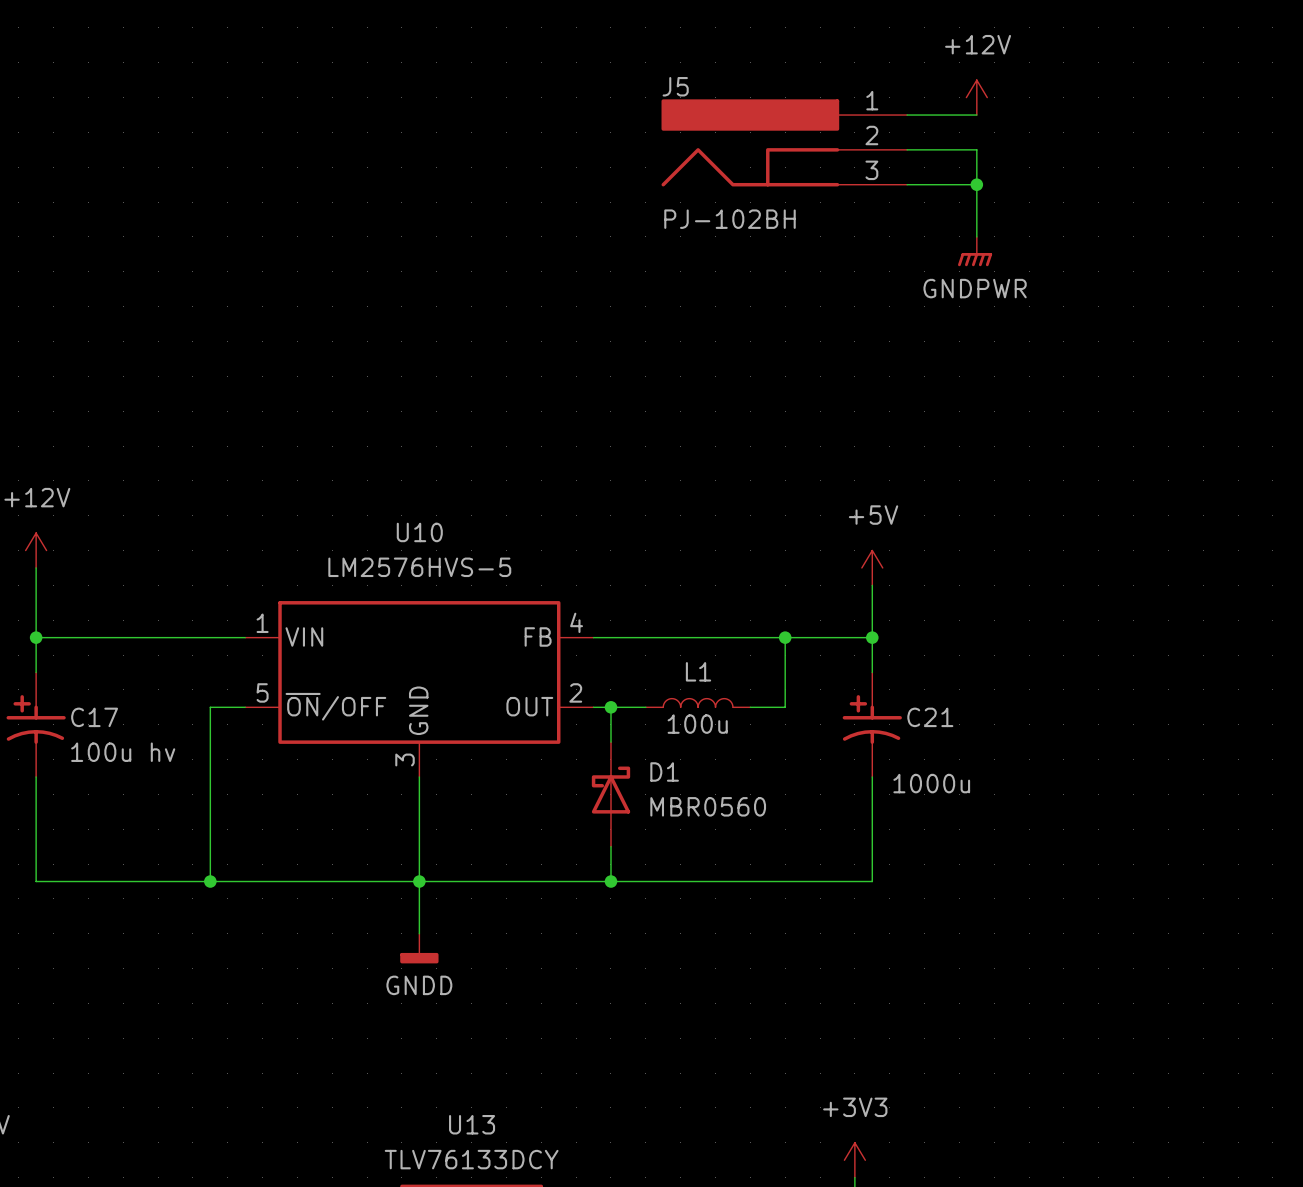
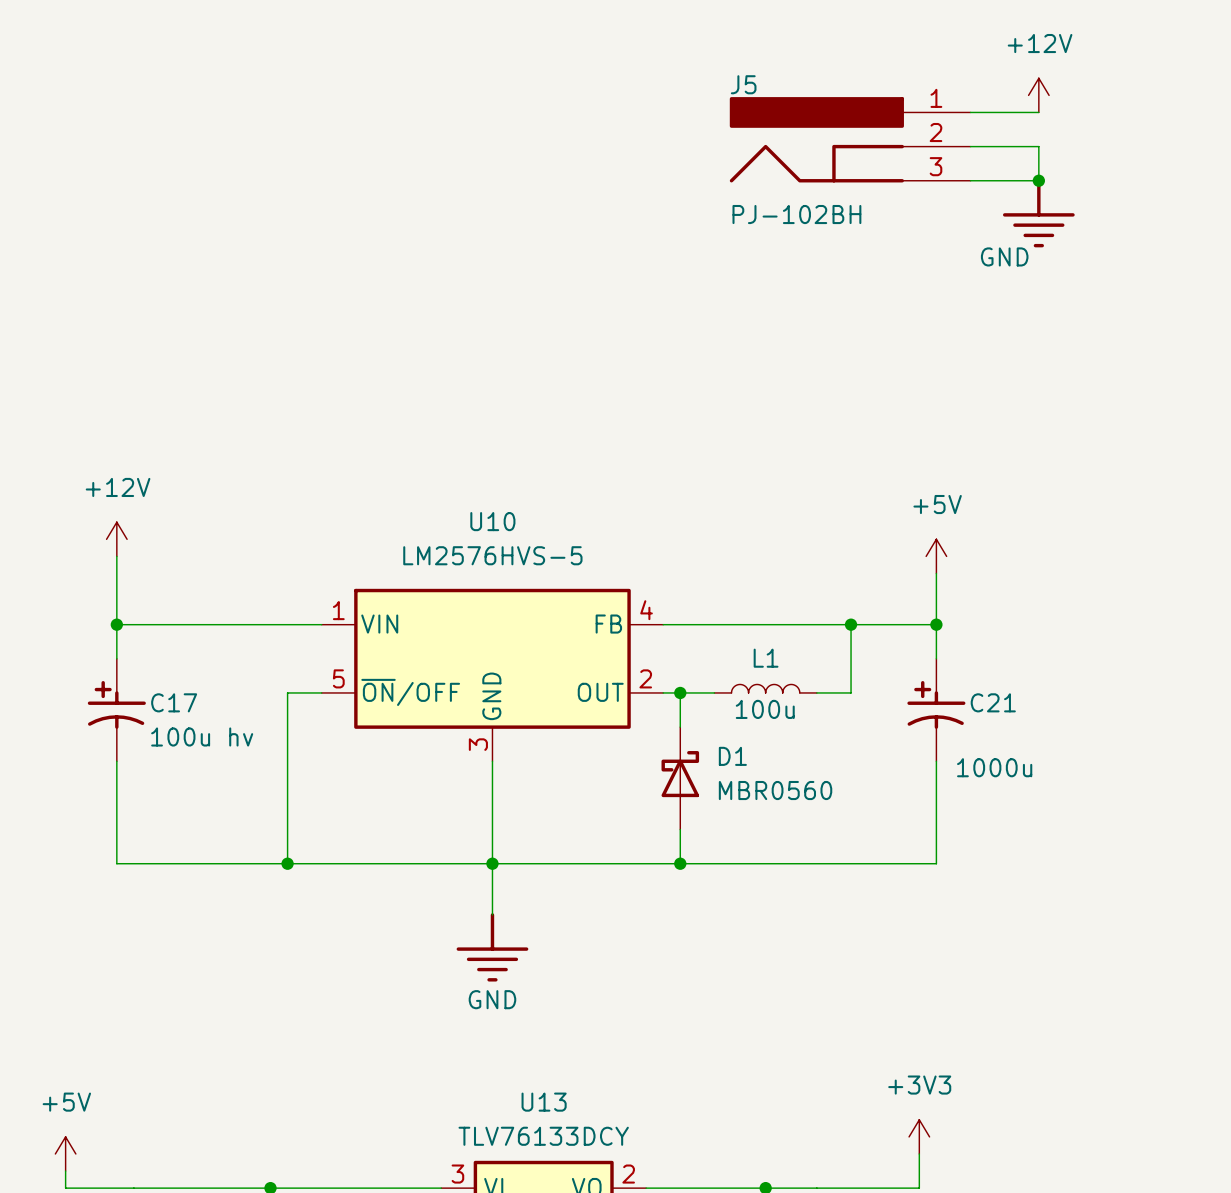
power symbol: none -> GND (1038, 213)
power symbol: GNDPWR (975, 251) -> none
power symbol: GNDD (419, 948) -> none
power symbol: none -> GND (492, 947)

